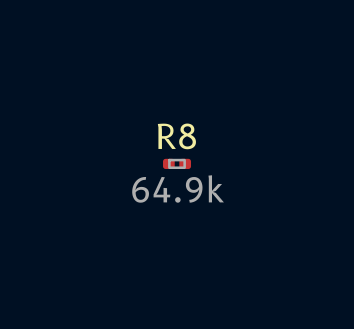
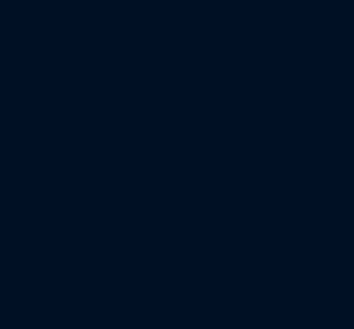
R8: 64.9k (177, 163) -> none

